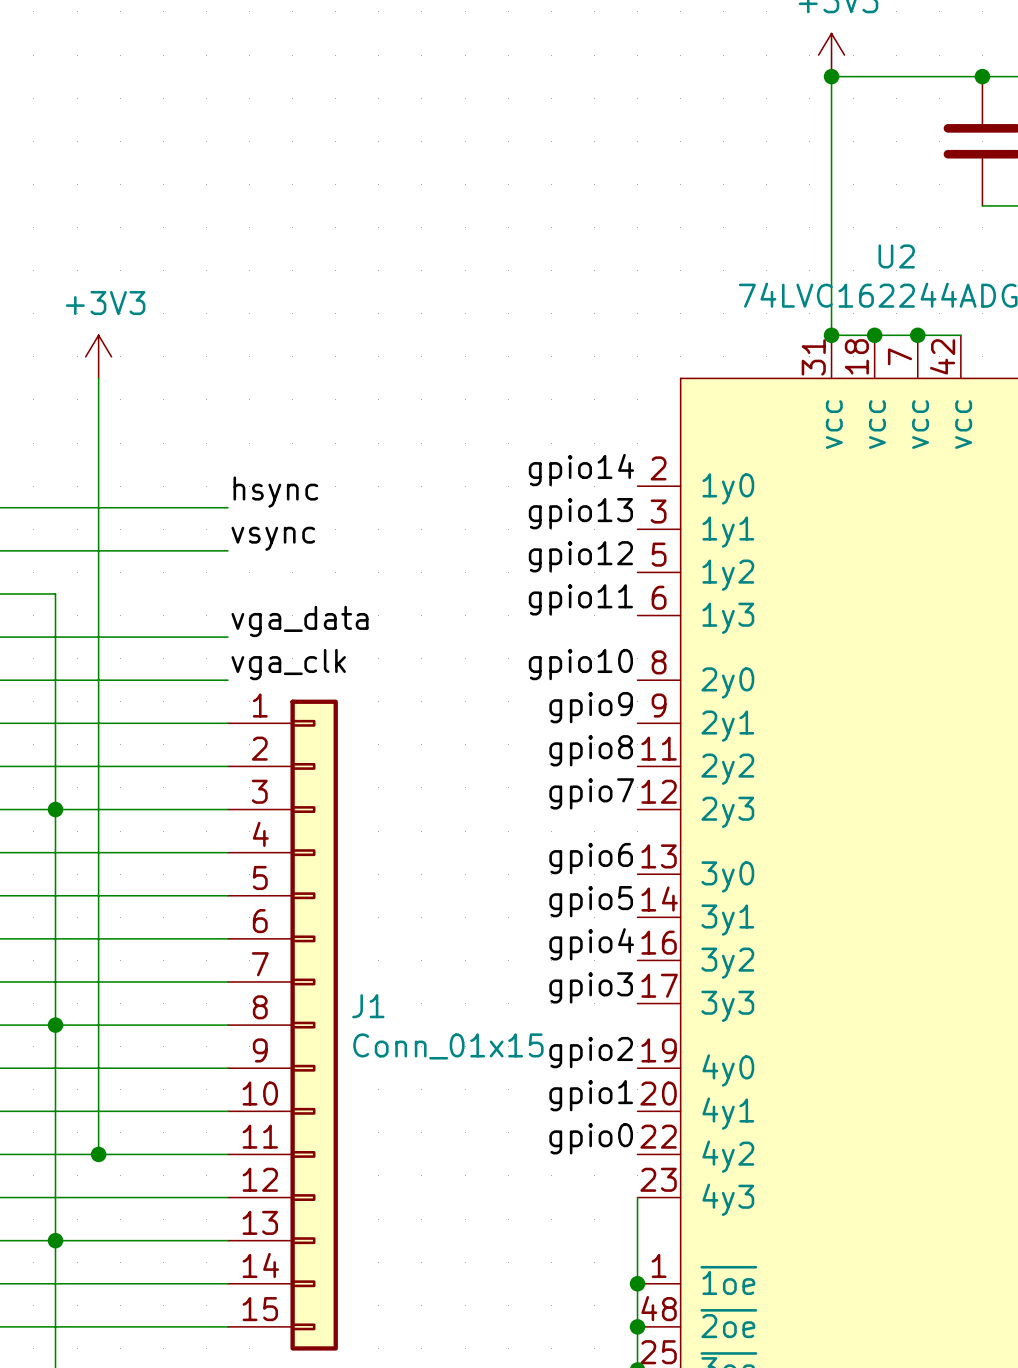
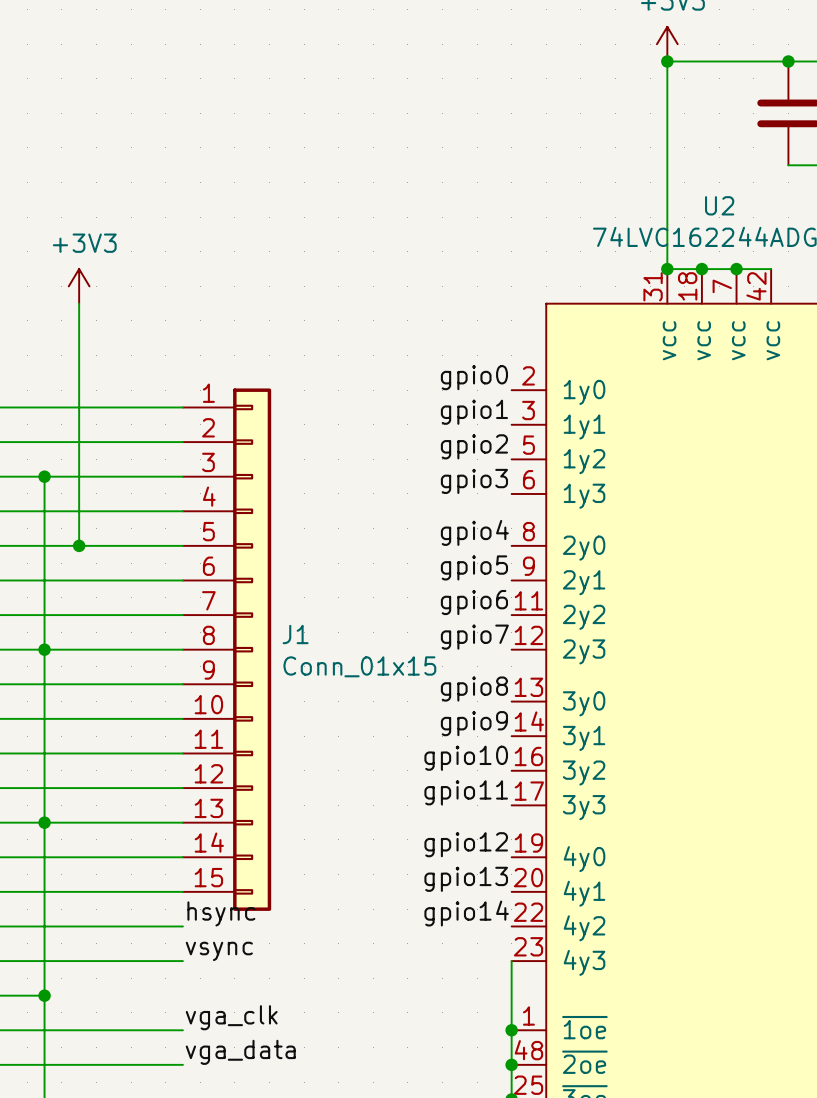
label: gpio14 (581, 470) -> gpio0 (474, 377)
label: hsync (275, 492) -> none
label: gpio13 (580, 513) -> gpio1 (474, 412)
label: vsync (273, 538) -> none
label: gpio12 (580, 556) -> gpio2 (474, 446)
wire: none -> (44, 476) (182, 476)
junction: none -> (44, 476)
label: gpio11 (580, 599) -> gpio3 (474, 481)
label: vga_data (299, 621) -> none
label: vga_clk (288, 664) -> none
label: gpio10 (580, 664) -> gpio4 (474, 532)
wire: (98, 680) (98, 1154) -> none
junction: none -> (79, 545)
label: gpio9 (591, 707) -> gpio5 (474, 567)
label: gpio8 (591, 750) -> gpio6 (474, 602)
label: gpio6 (591, 858) -> gpio8 (474, 689)
label: gpio5 (591, 901) -> gpio9 (474, 723)
label: gpio4 (591, 944) -> gpio10 (466, 758)
label: gpio3 (591, 987) -> gpio11 (466, 792)
J1 position: (282, 1025) -> (227, 649)
label: gpio2 (591, 1052) -> gpio12 (466, 844)
label: gpio1 (591, 1095) -> gpio13 (466, 879)
label: none -> hsync (221, 913)
label: gpio0 (591, 1138) -> gpio14 (466, 913)
junction: (98, 1154) -> none
label: none -> vsync (219, 951)
wire: (55, 1240) (227, 1240) -> none
label: none -> vga_clk (231, 1017)
label: none -> vga_data (240, 1052)

